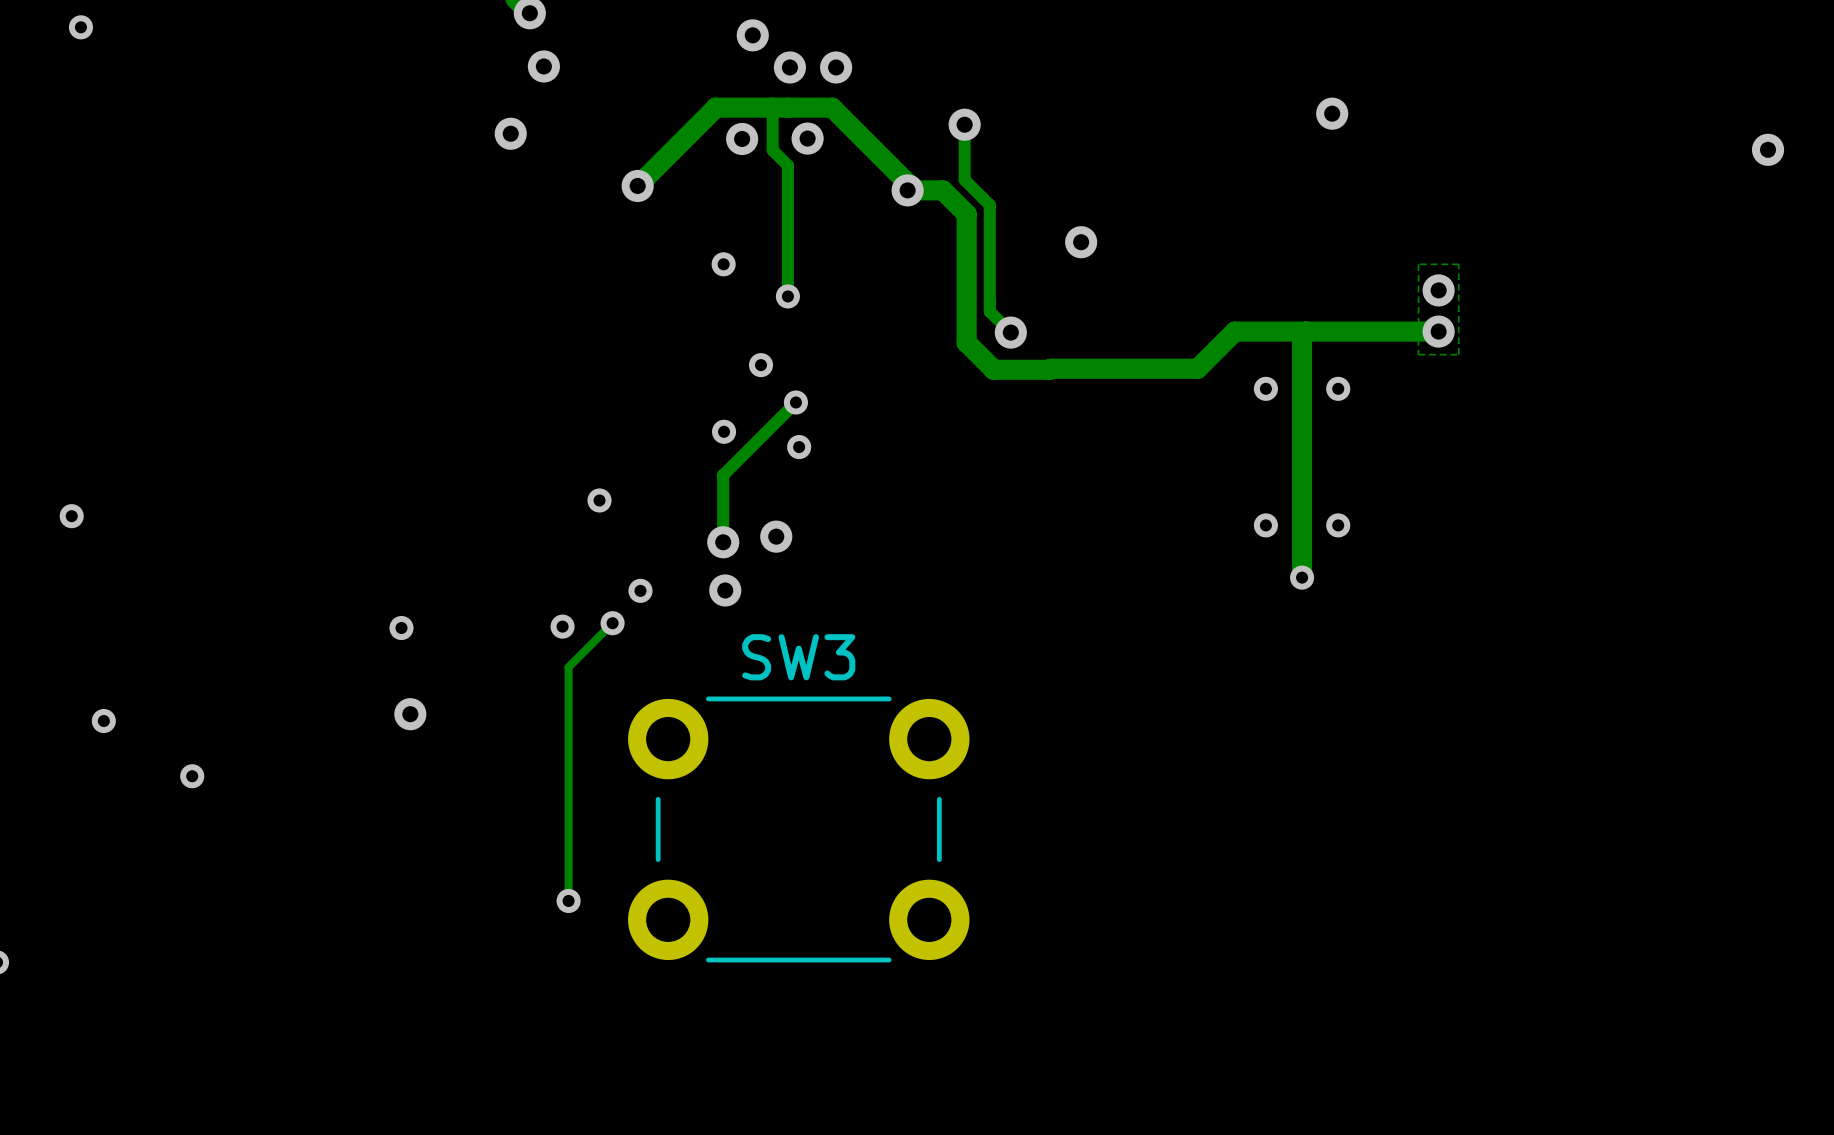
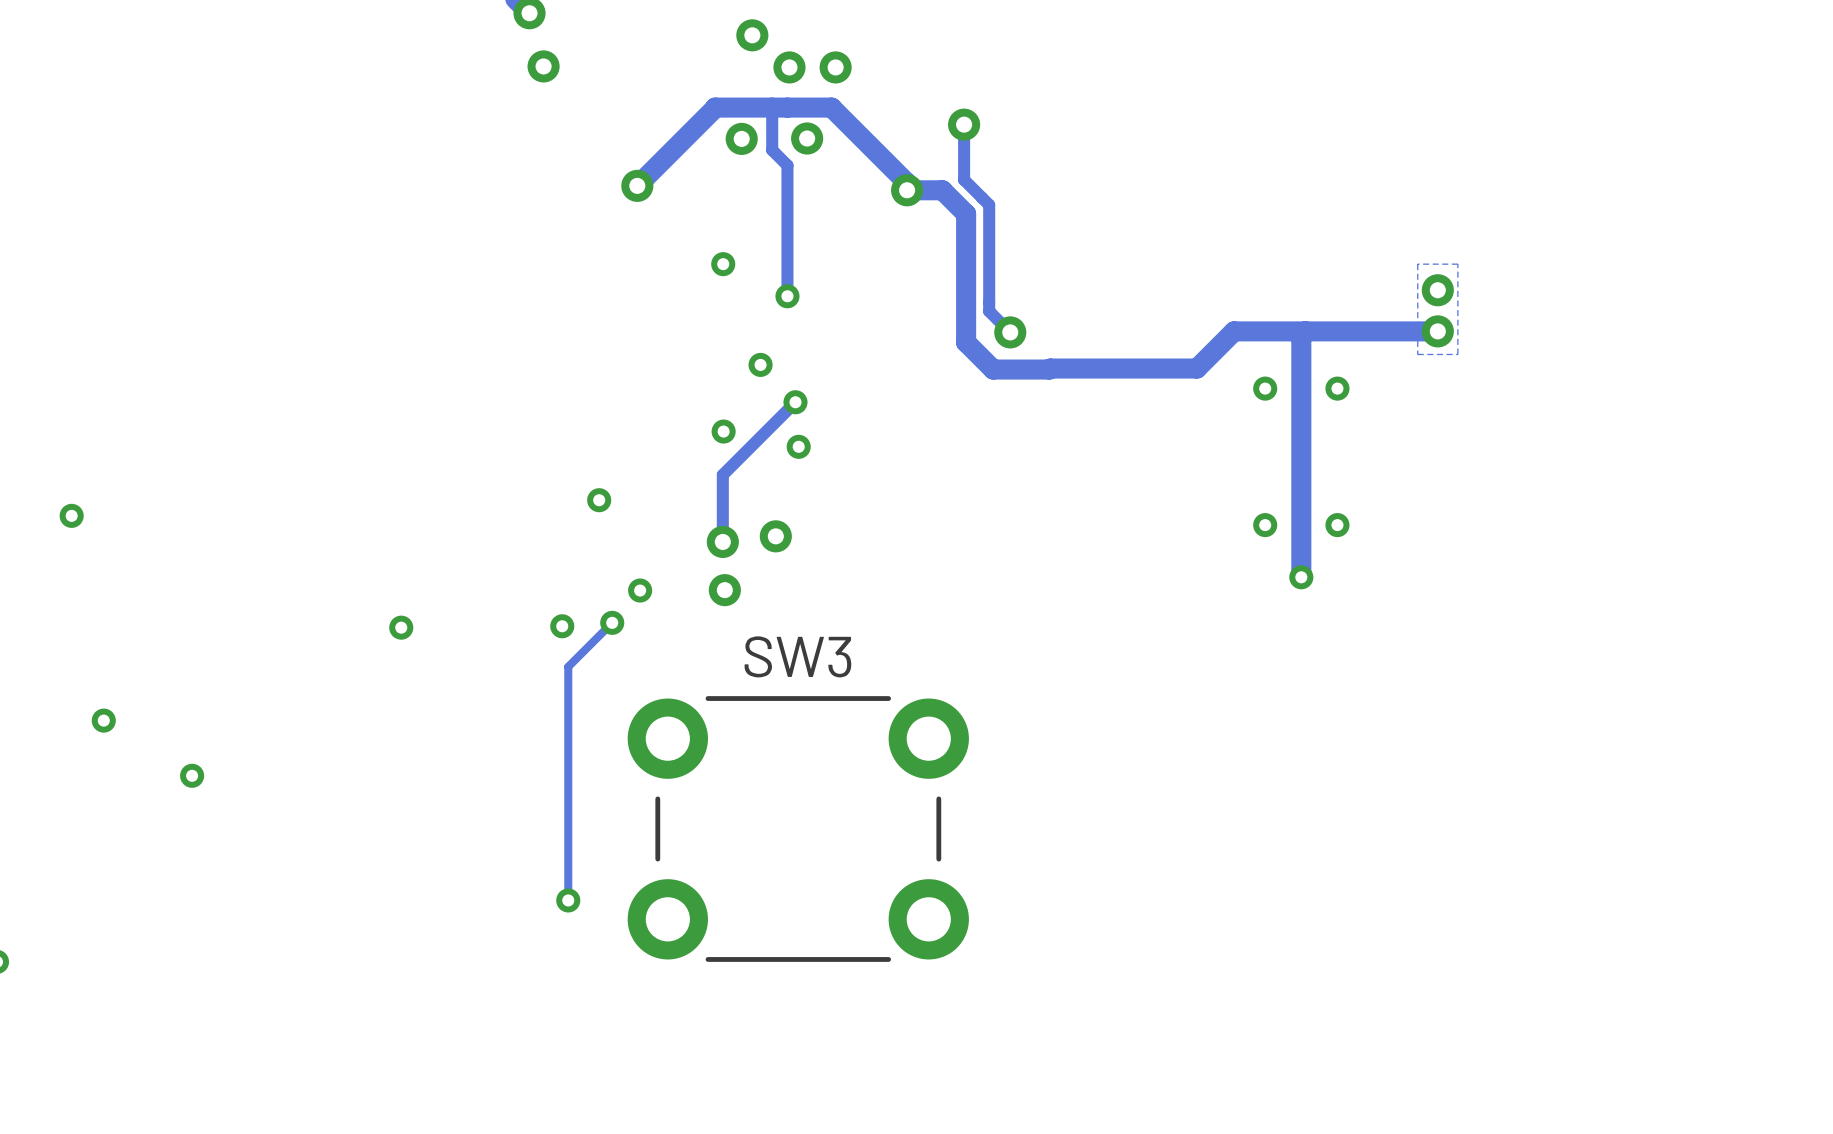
via: (80, 27) -> none
via: (1332, 113) -> none
via: (510, 133) -> none
via: (1768, 149) -> none
via: (1081, 242) -> none
via: (410, 714) -> none

